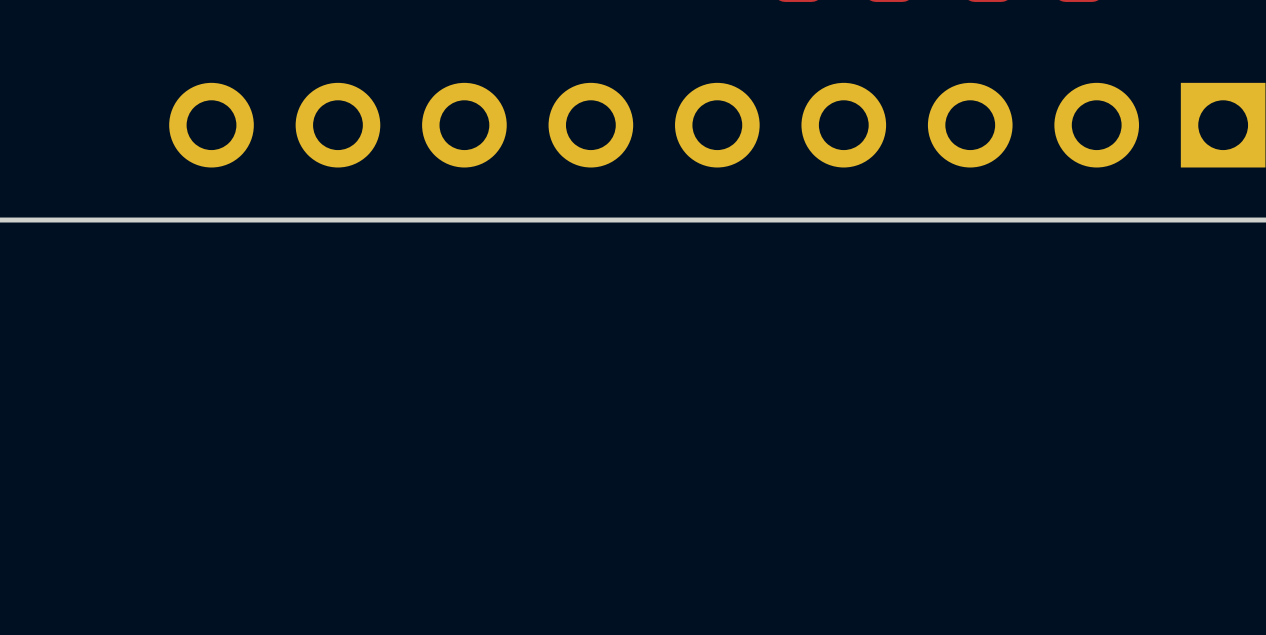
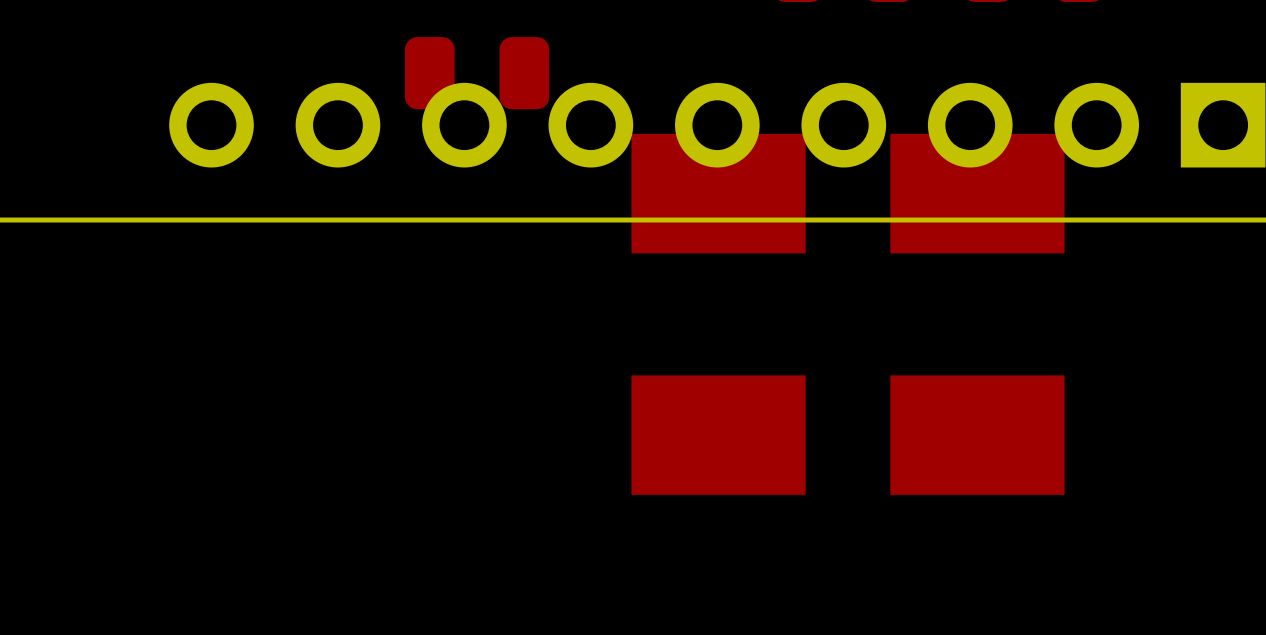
part: none -> (477, 73)
part: none -> (848, 193)
part: none -> (848, 435)

